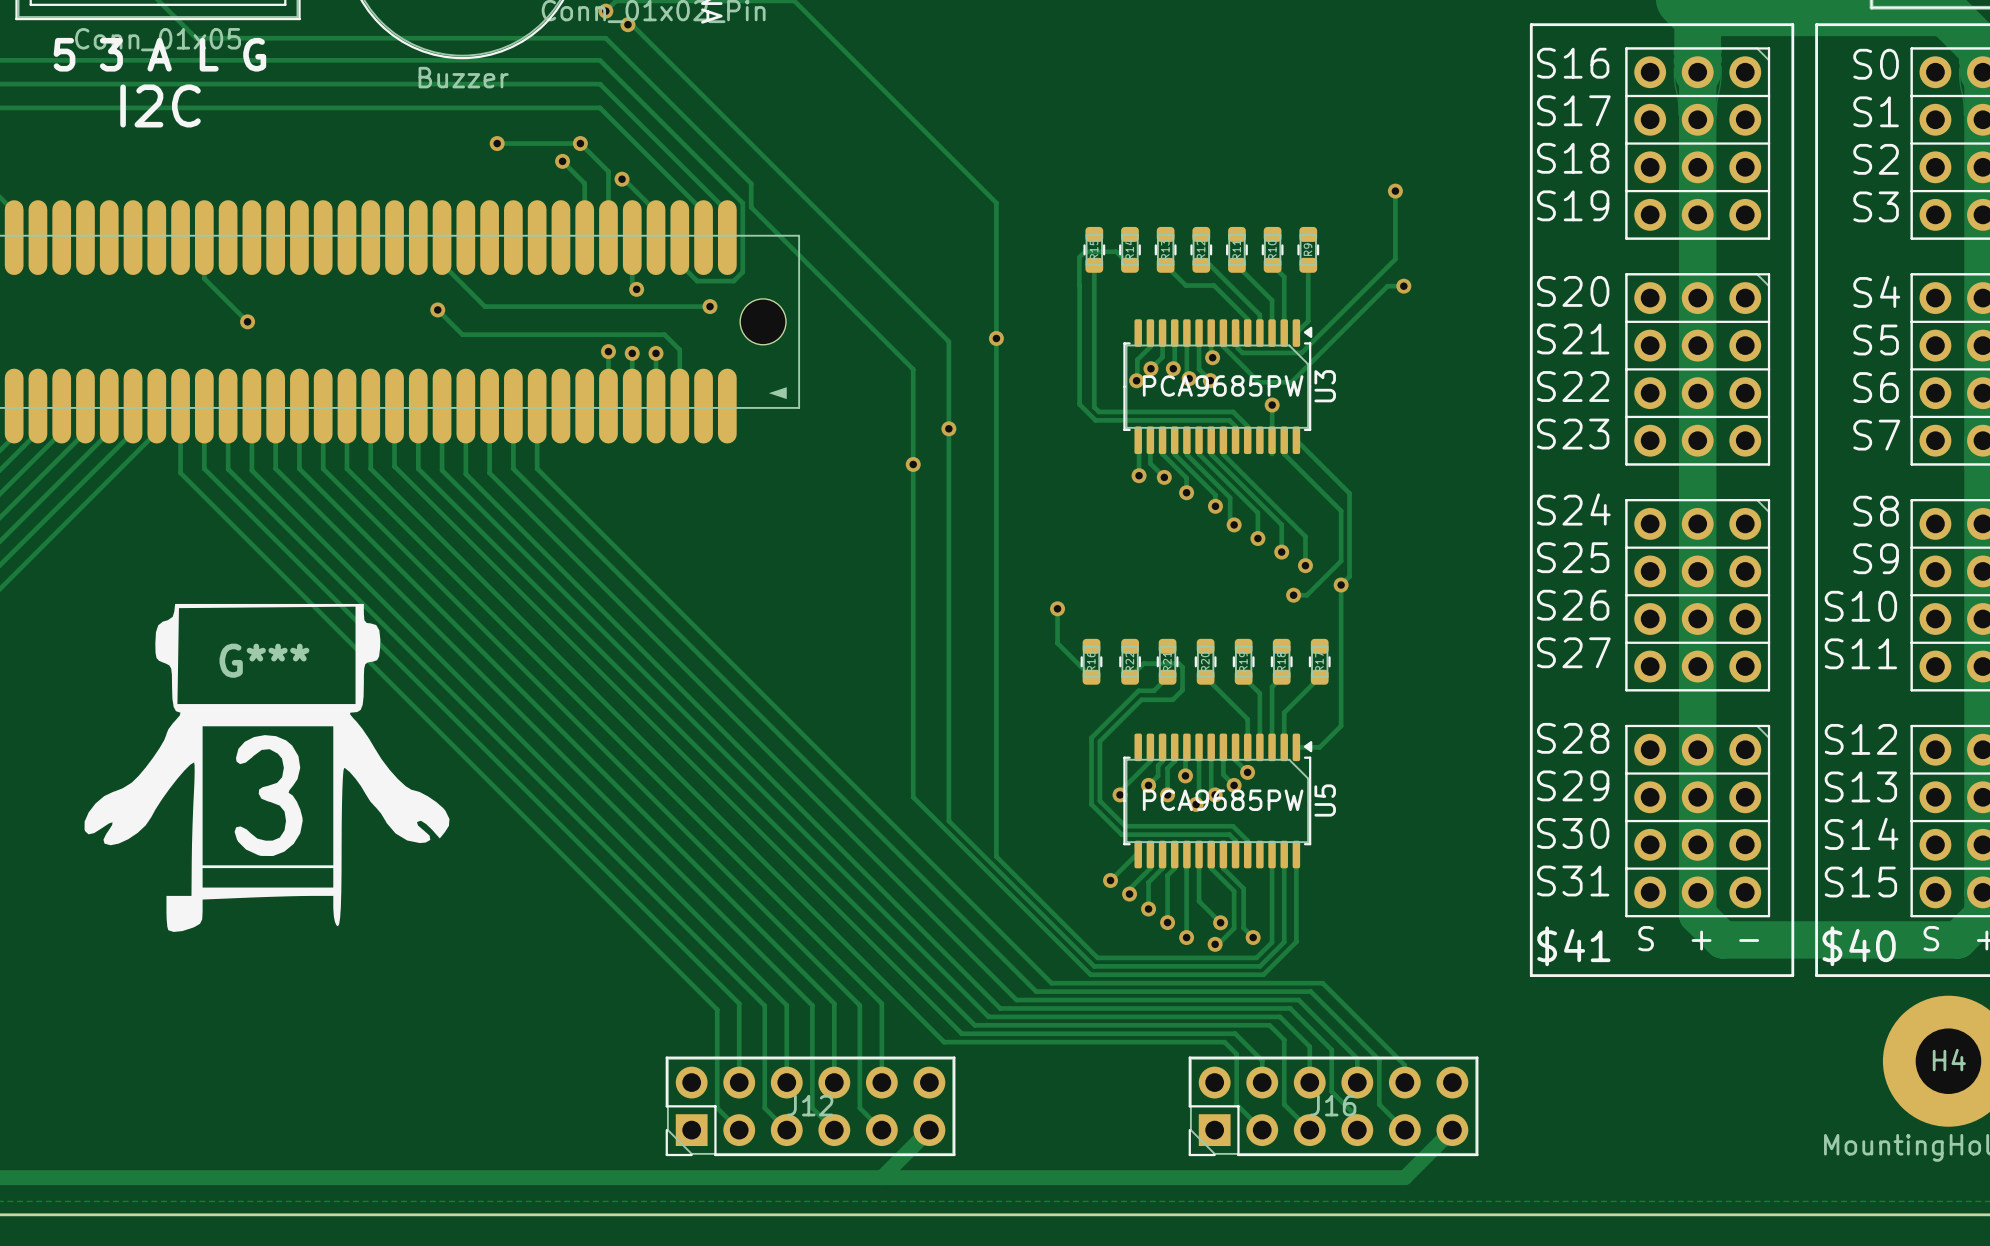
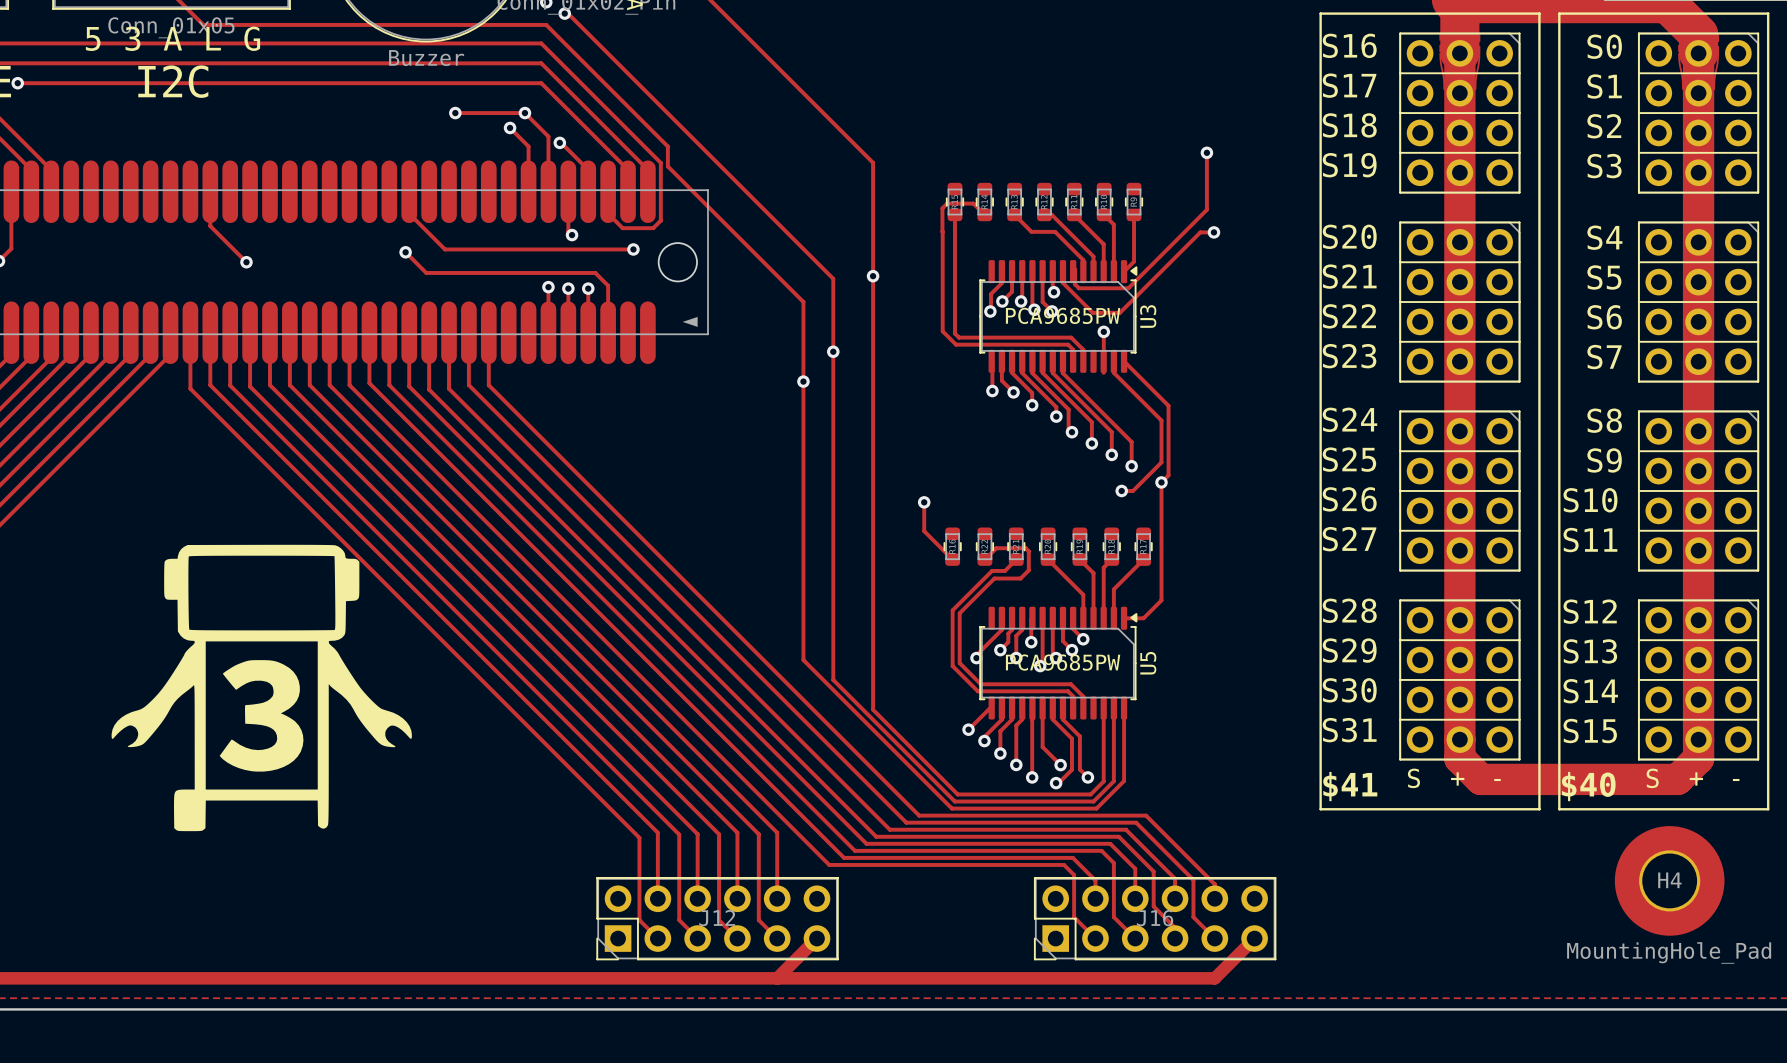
drawing: none -> [111, 544, 412, 832]
G***: (267, 767) -> none

